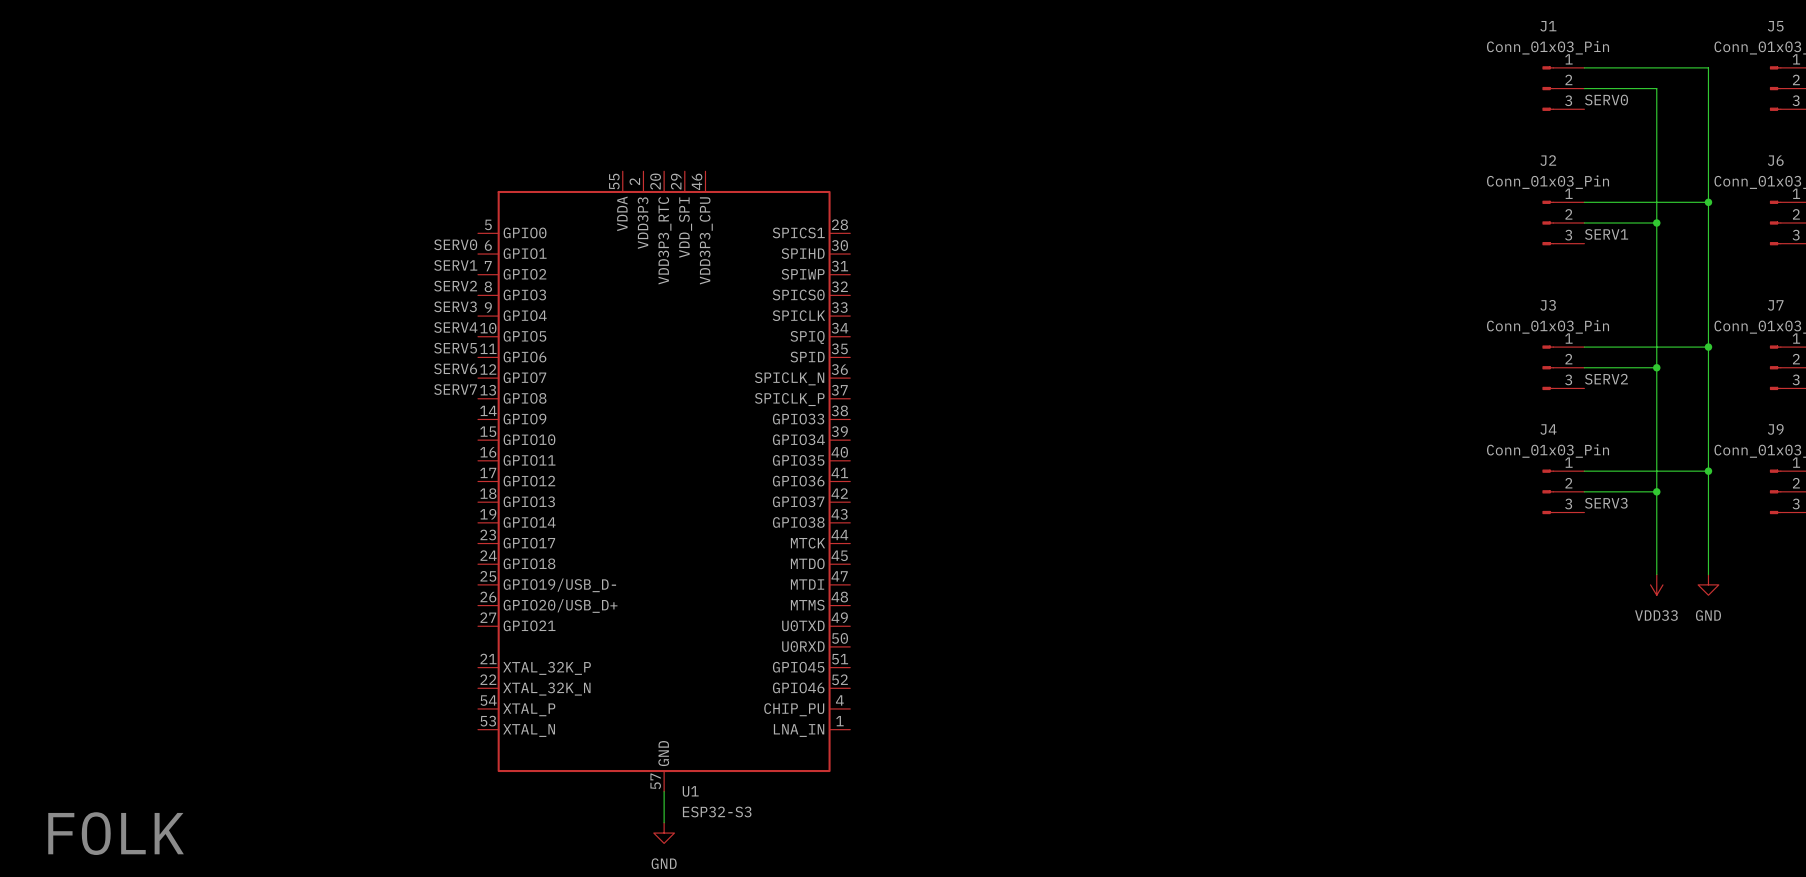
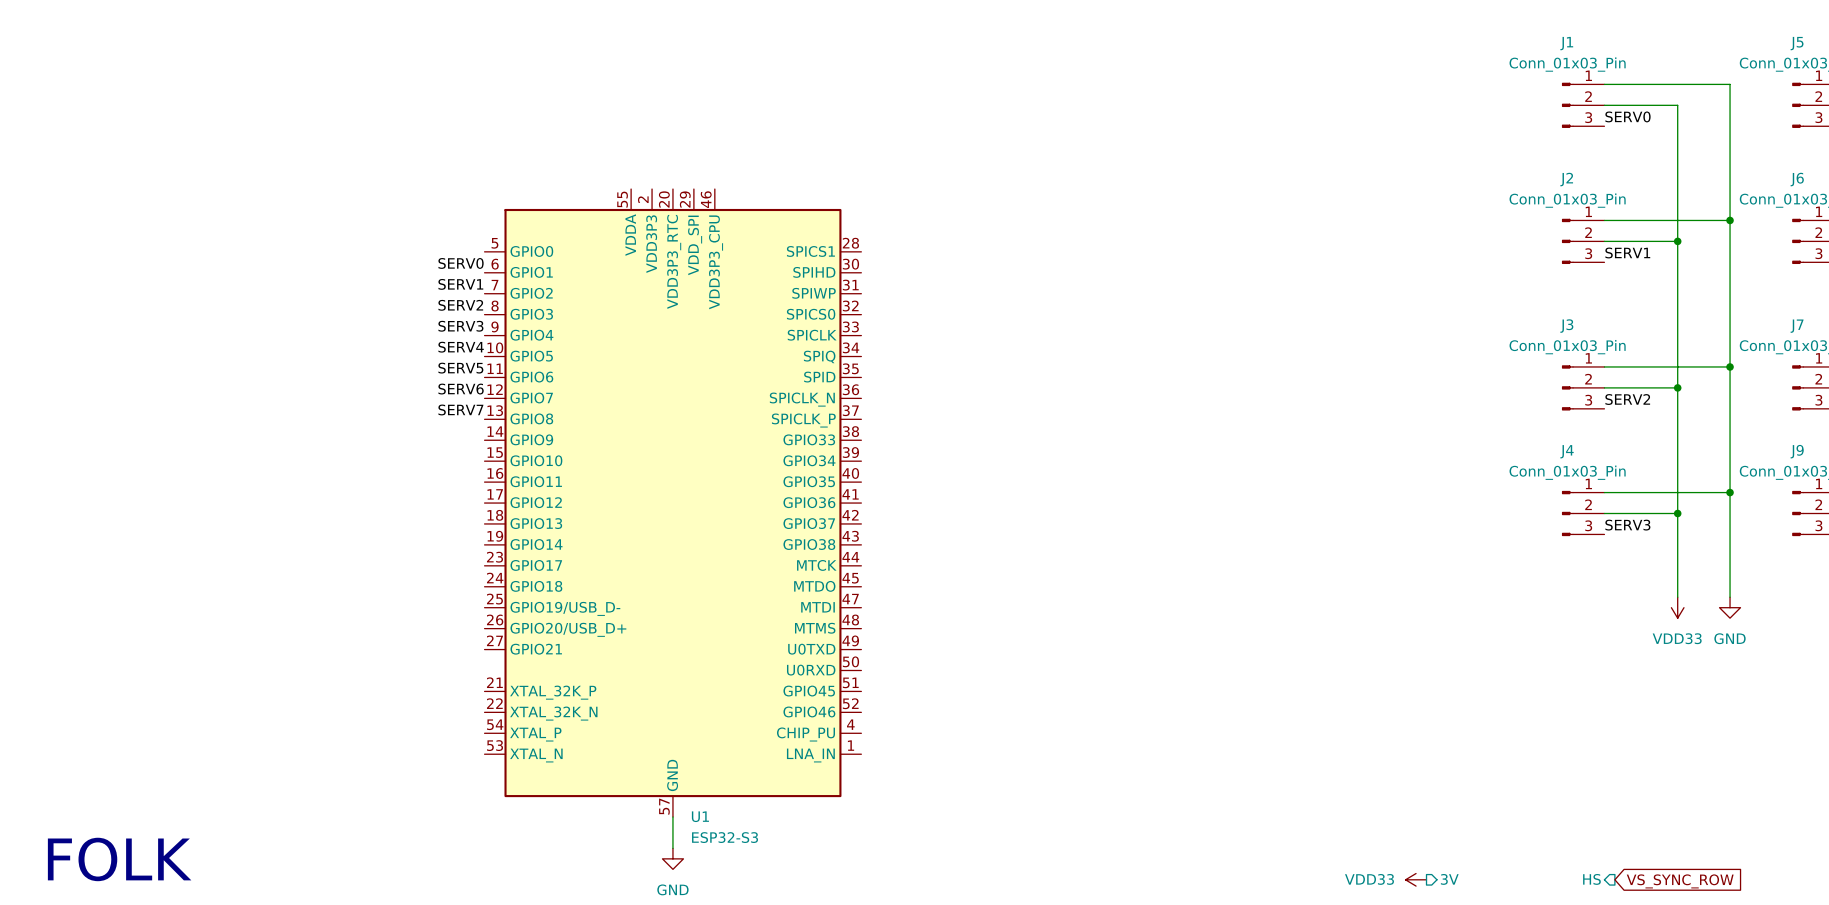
power symbol: none -> VDD33 (1416, 879)
sheet pin: none -> 3V (1449, 879)
sheet pin: none -> HS (1591, 879)
global label: none -> VS_SYNC_ROW (1680, 881)

